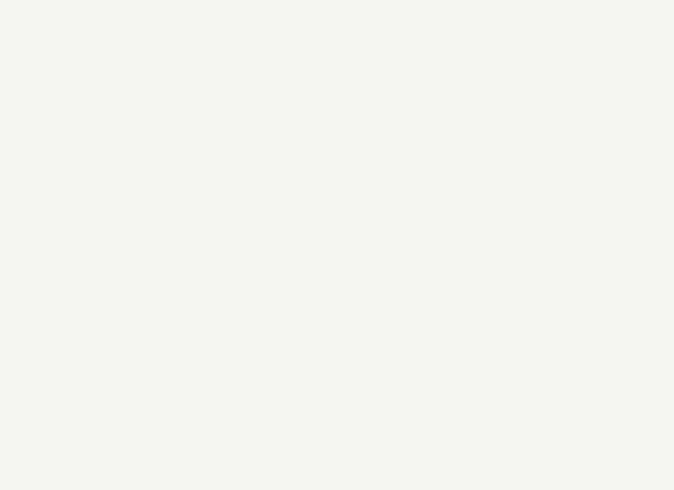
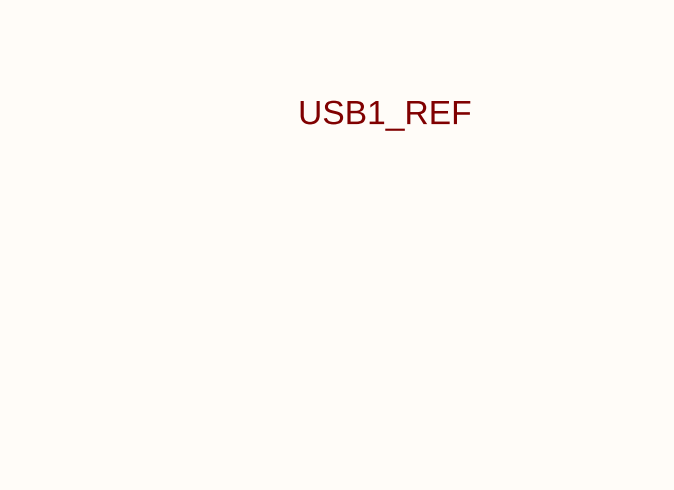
label: none -> USB1_REF (385, 115)

